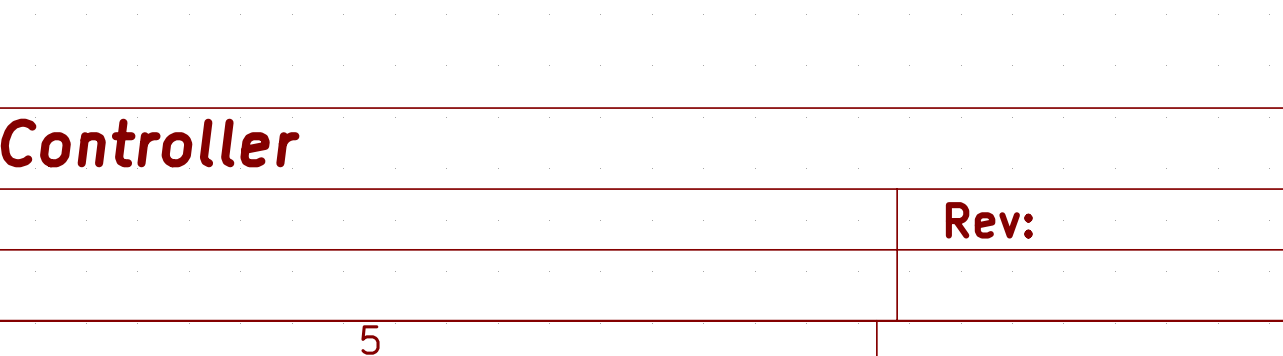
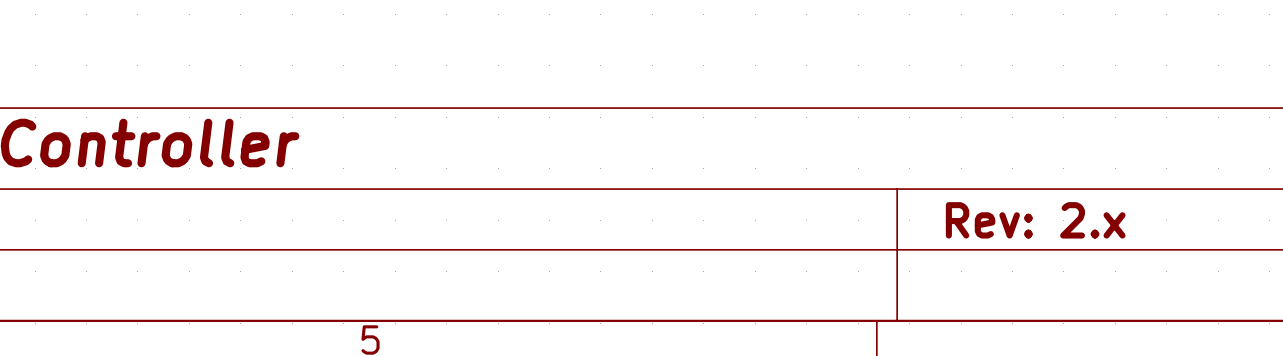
title block: Rev: (989, 220) -> Rev: 2.x (1035, 220)

